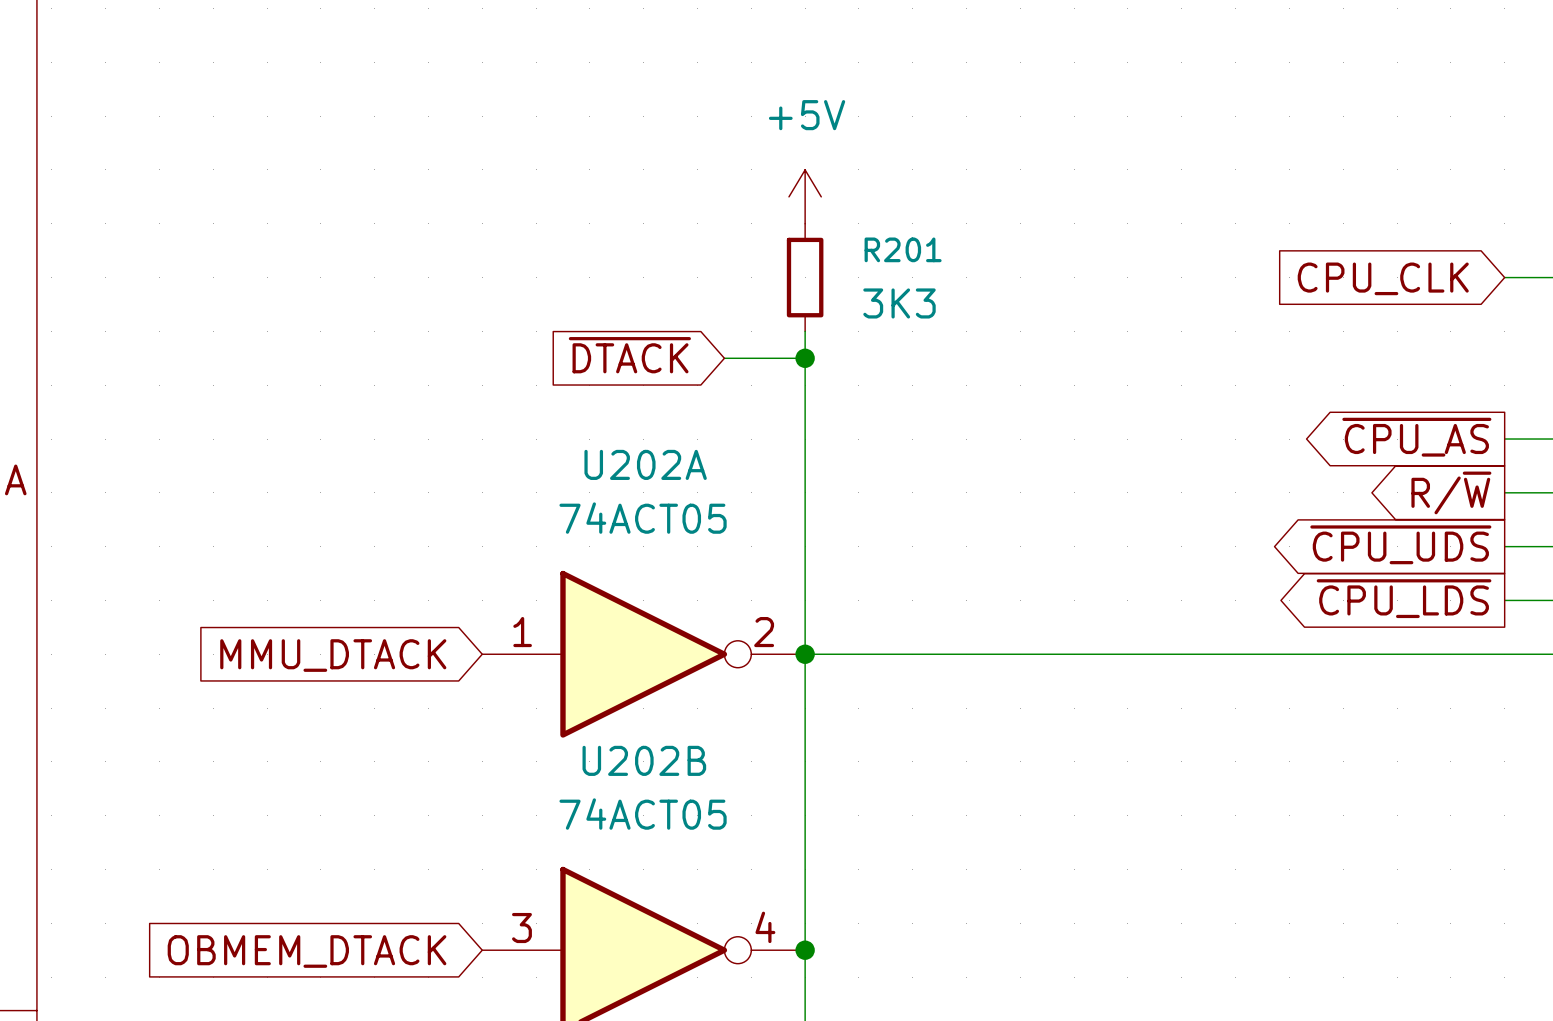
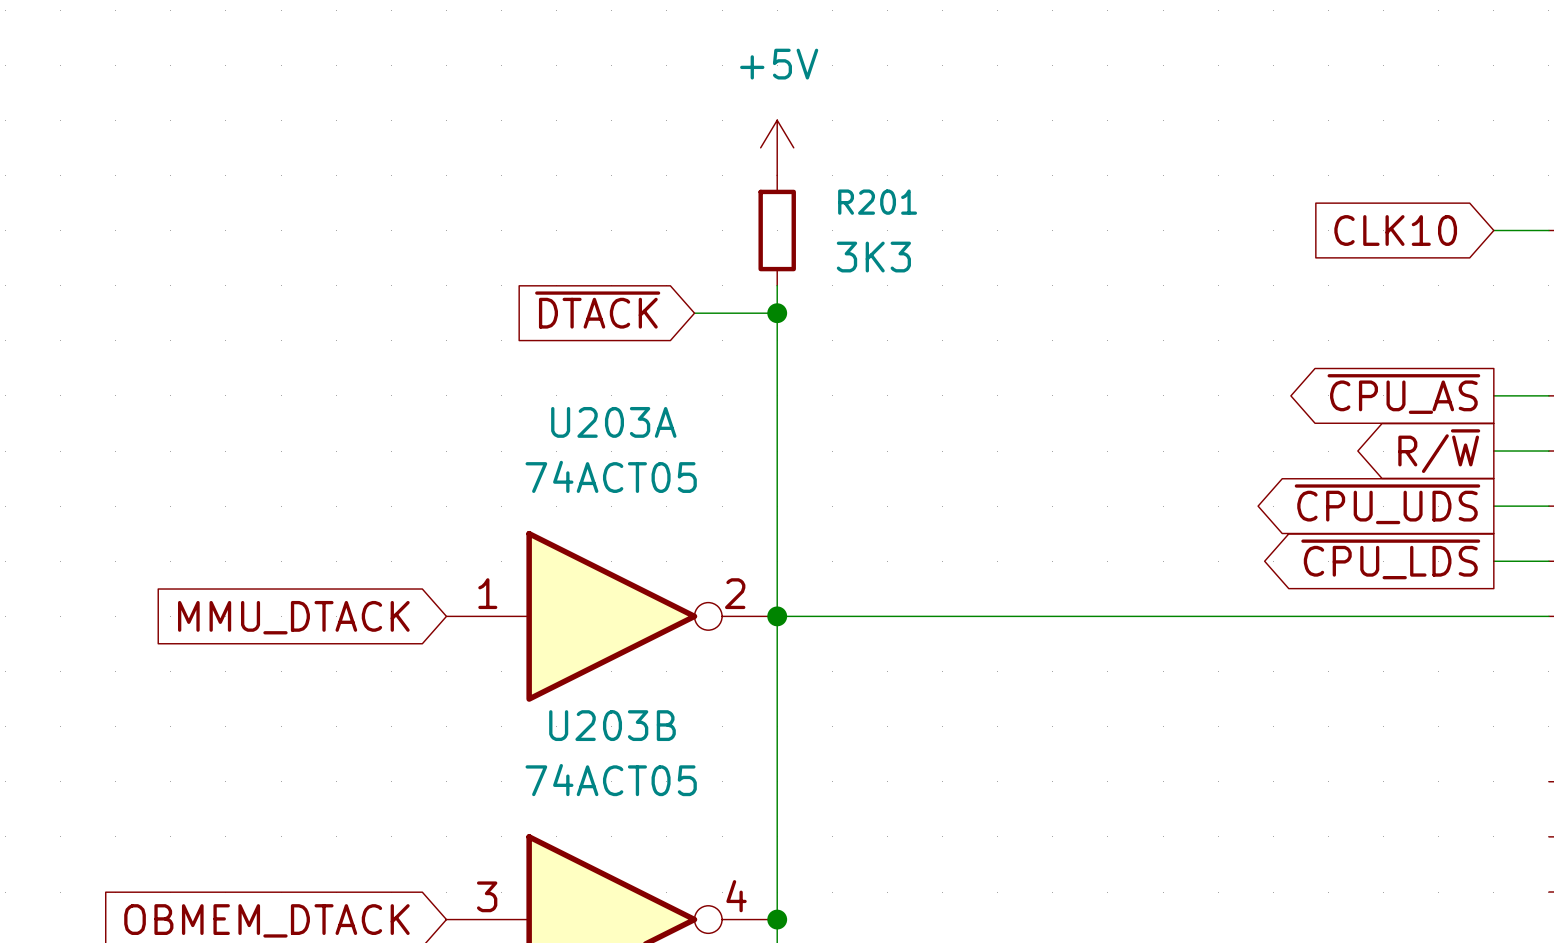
global label: CPU_CLK (1383, 278) -> CLK10 (1395, 230)
U202A name: U202A (645, 464) -> U203A (613, 422)
U202B name: U202B (644, 760) -> U203B (612, 725)

